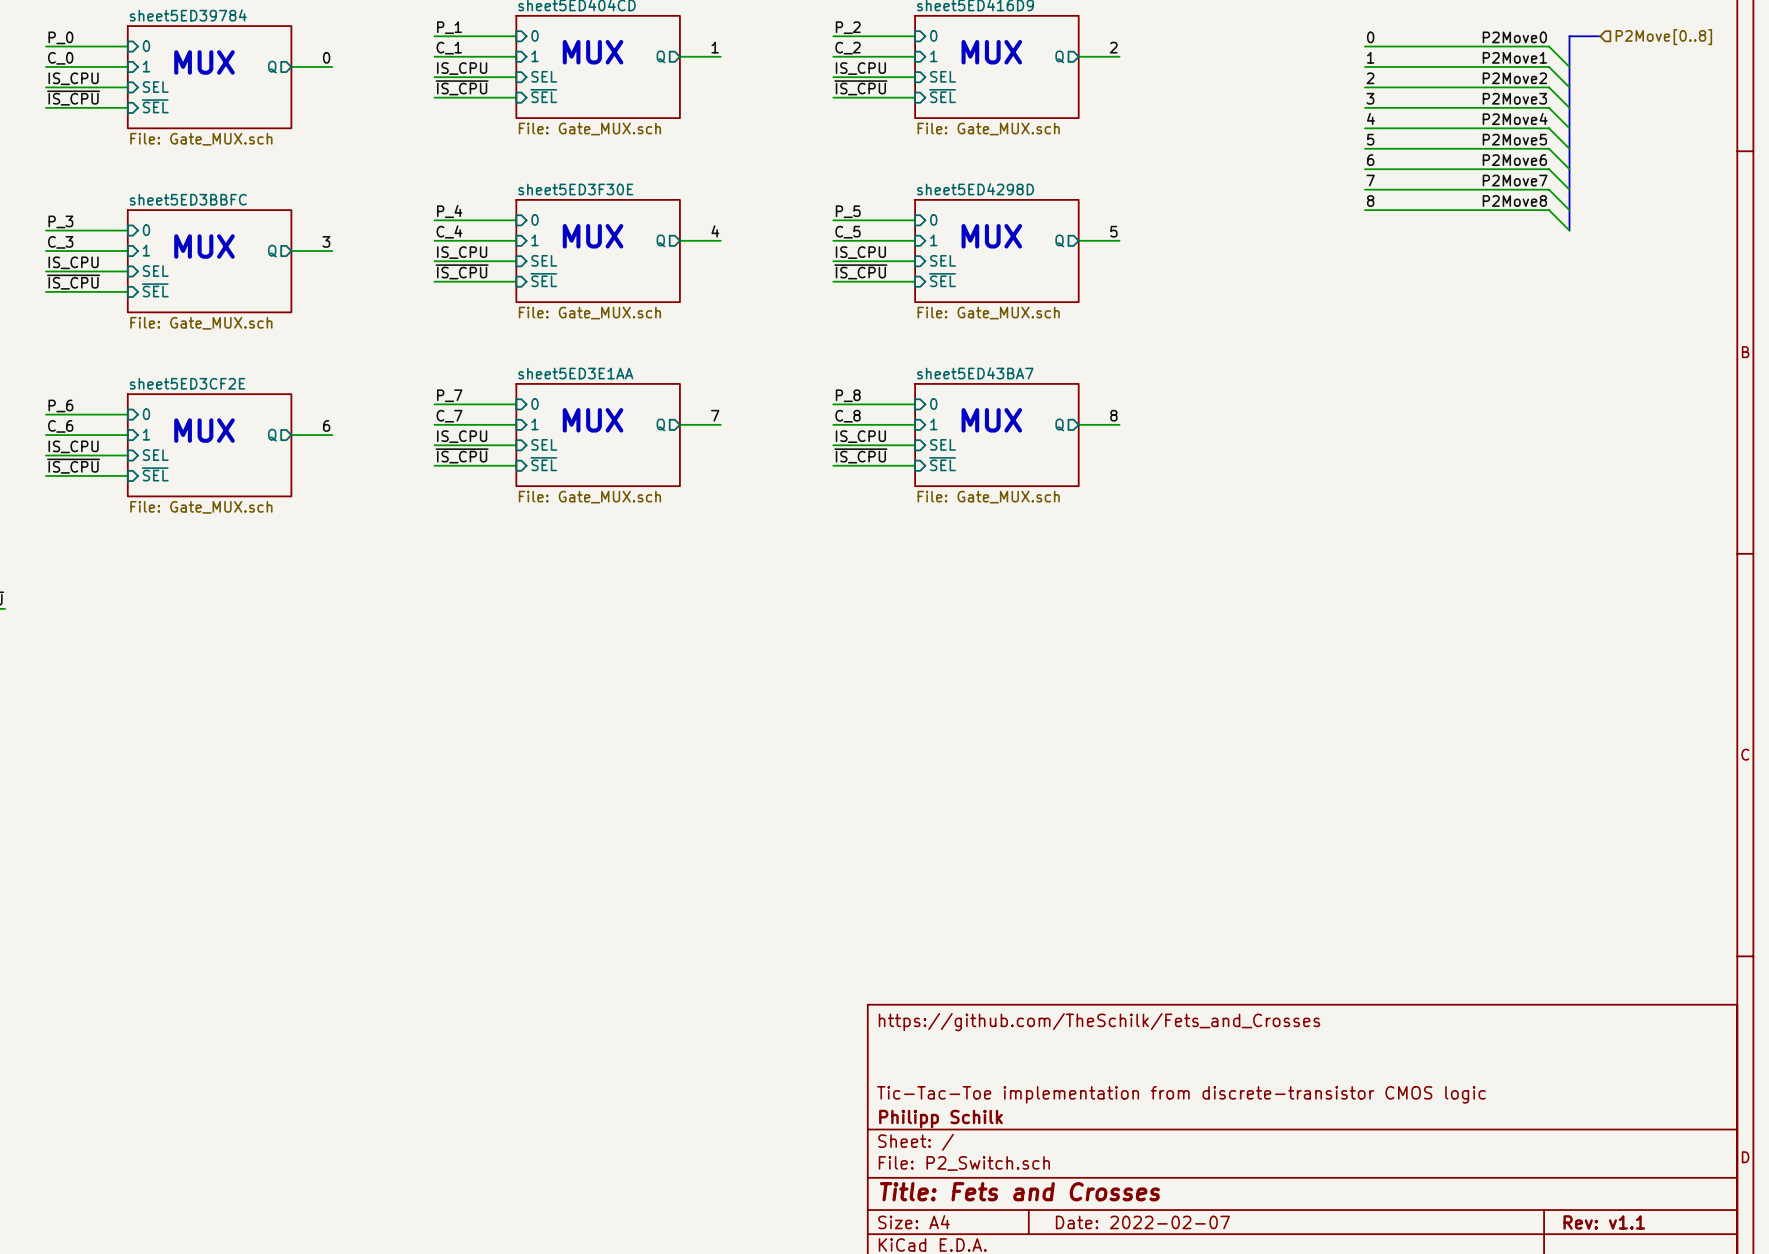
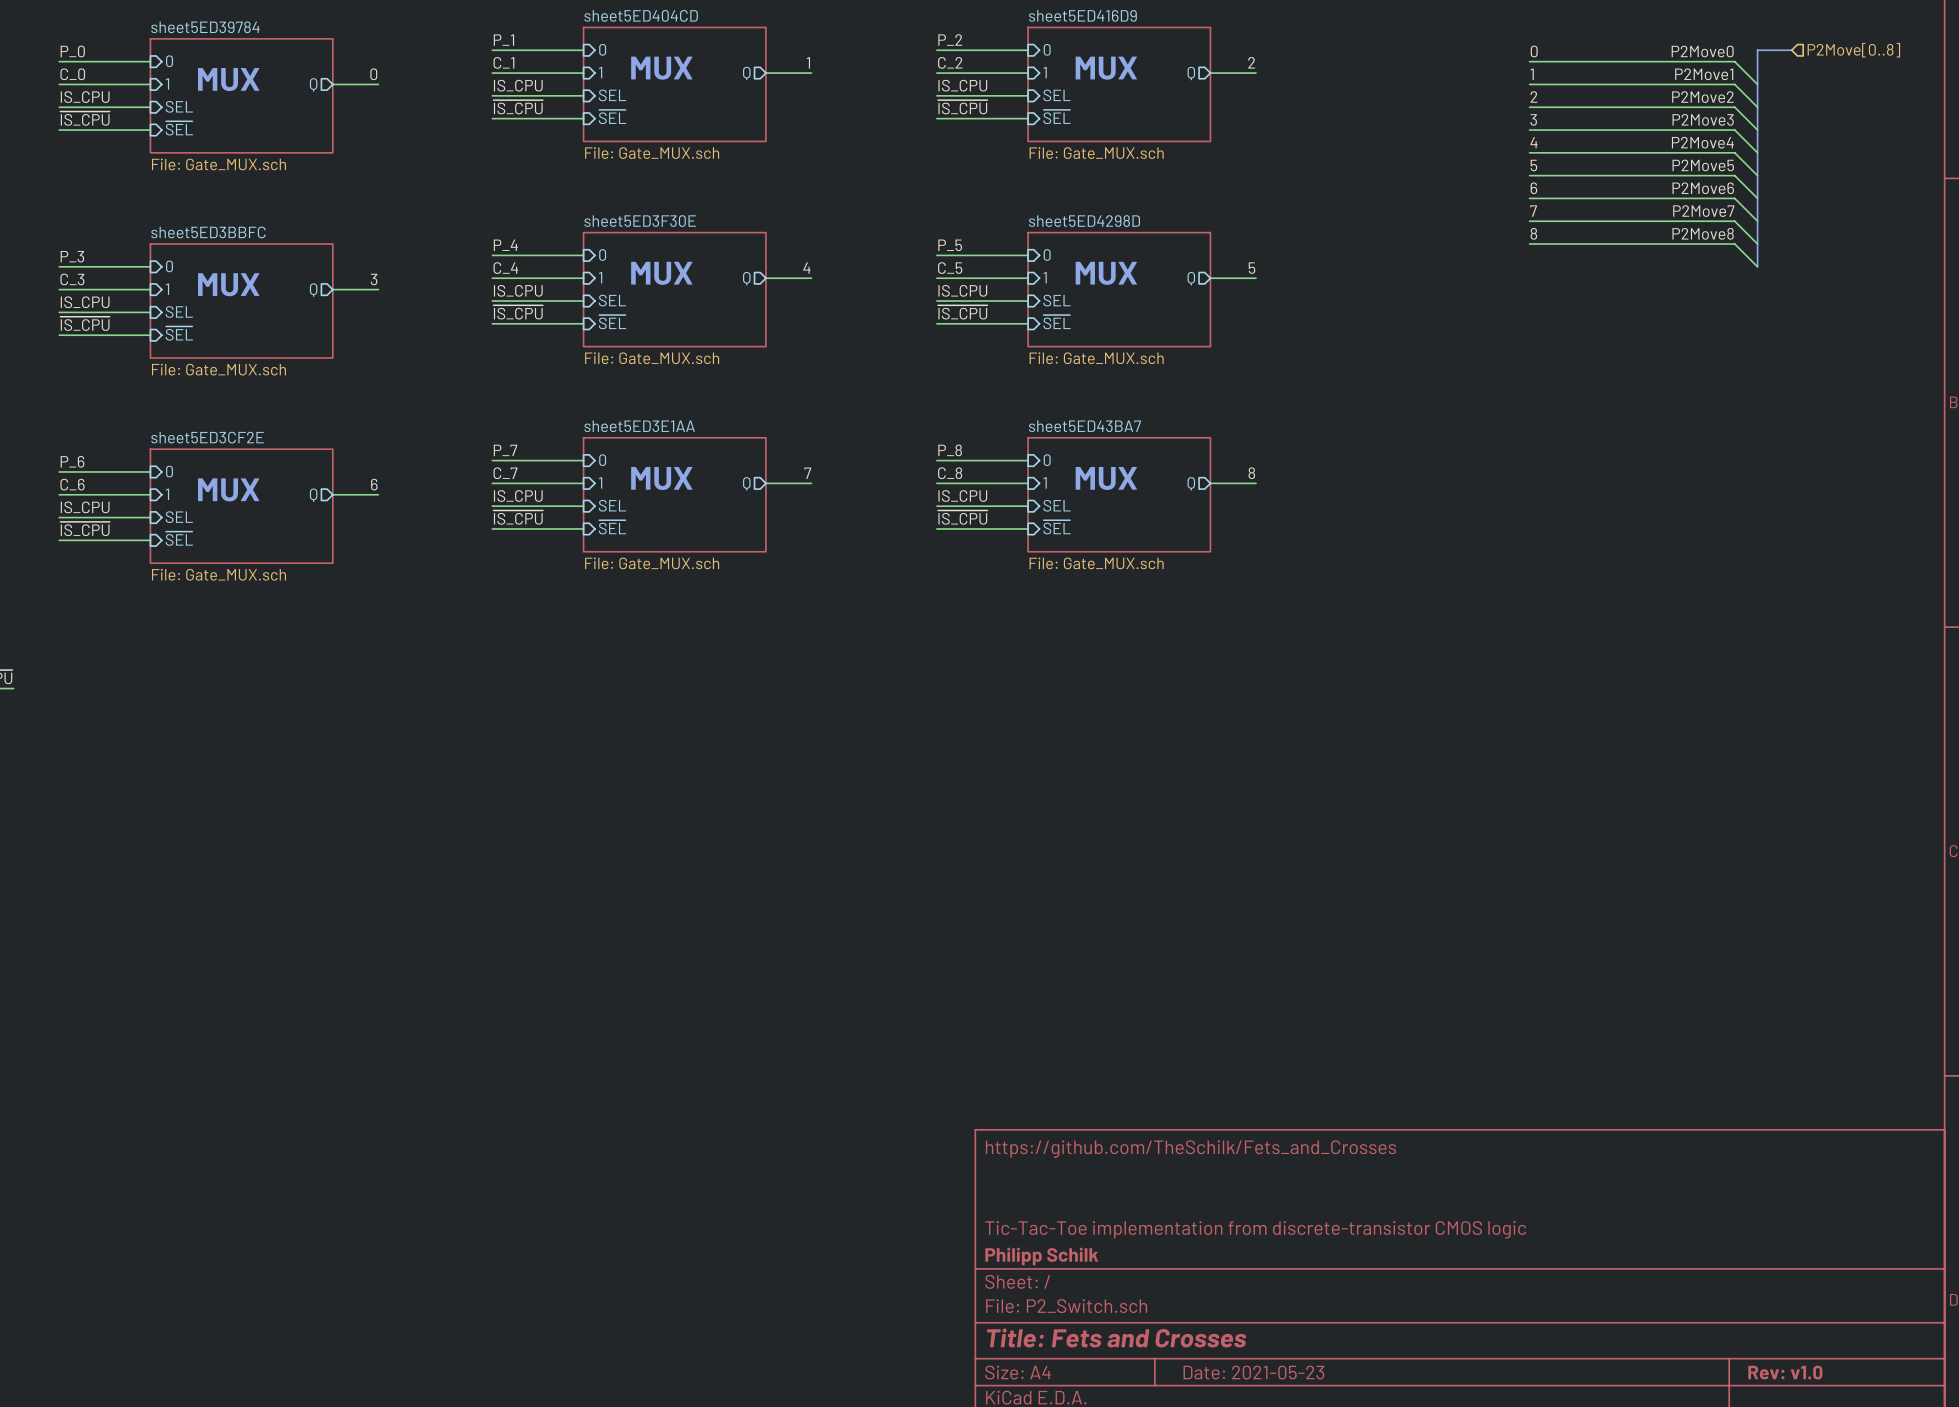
title block: Date: 2022-02-07 (1142, 1222) -> Date: 2021-05-23 (1253, 1372)
title block: Rev: v1.1 (1604, 1222) -> Rev: v1.0 (1785, 1372)

